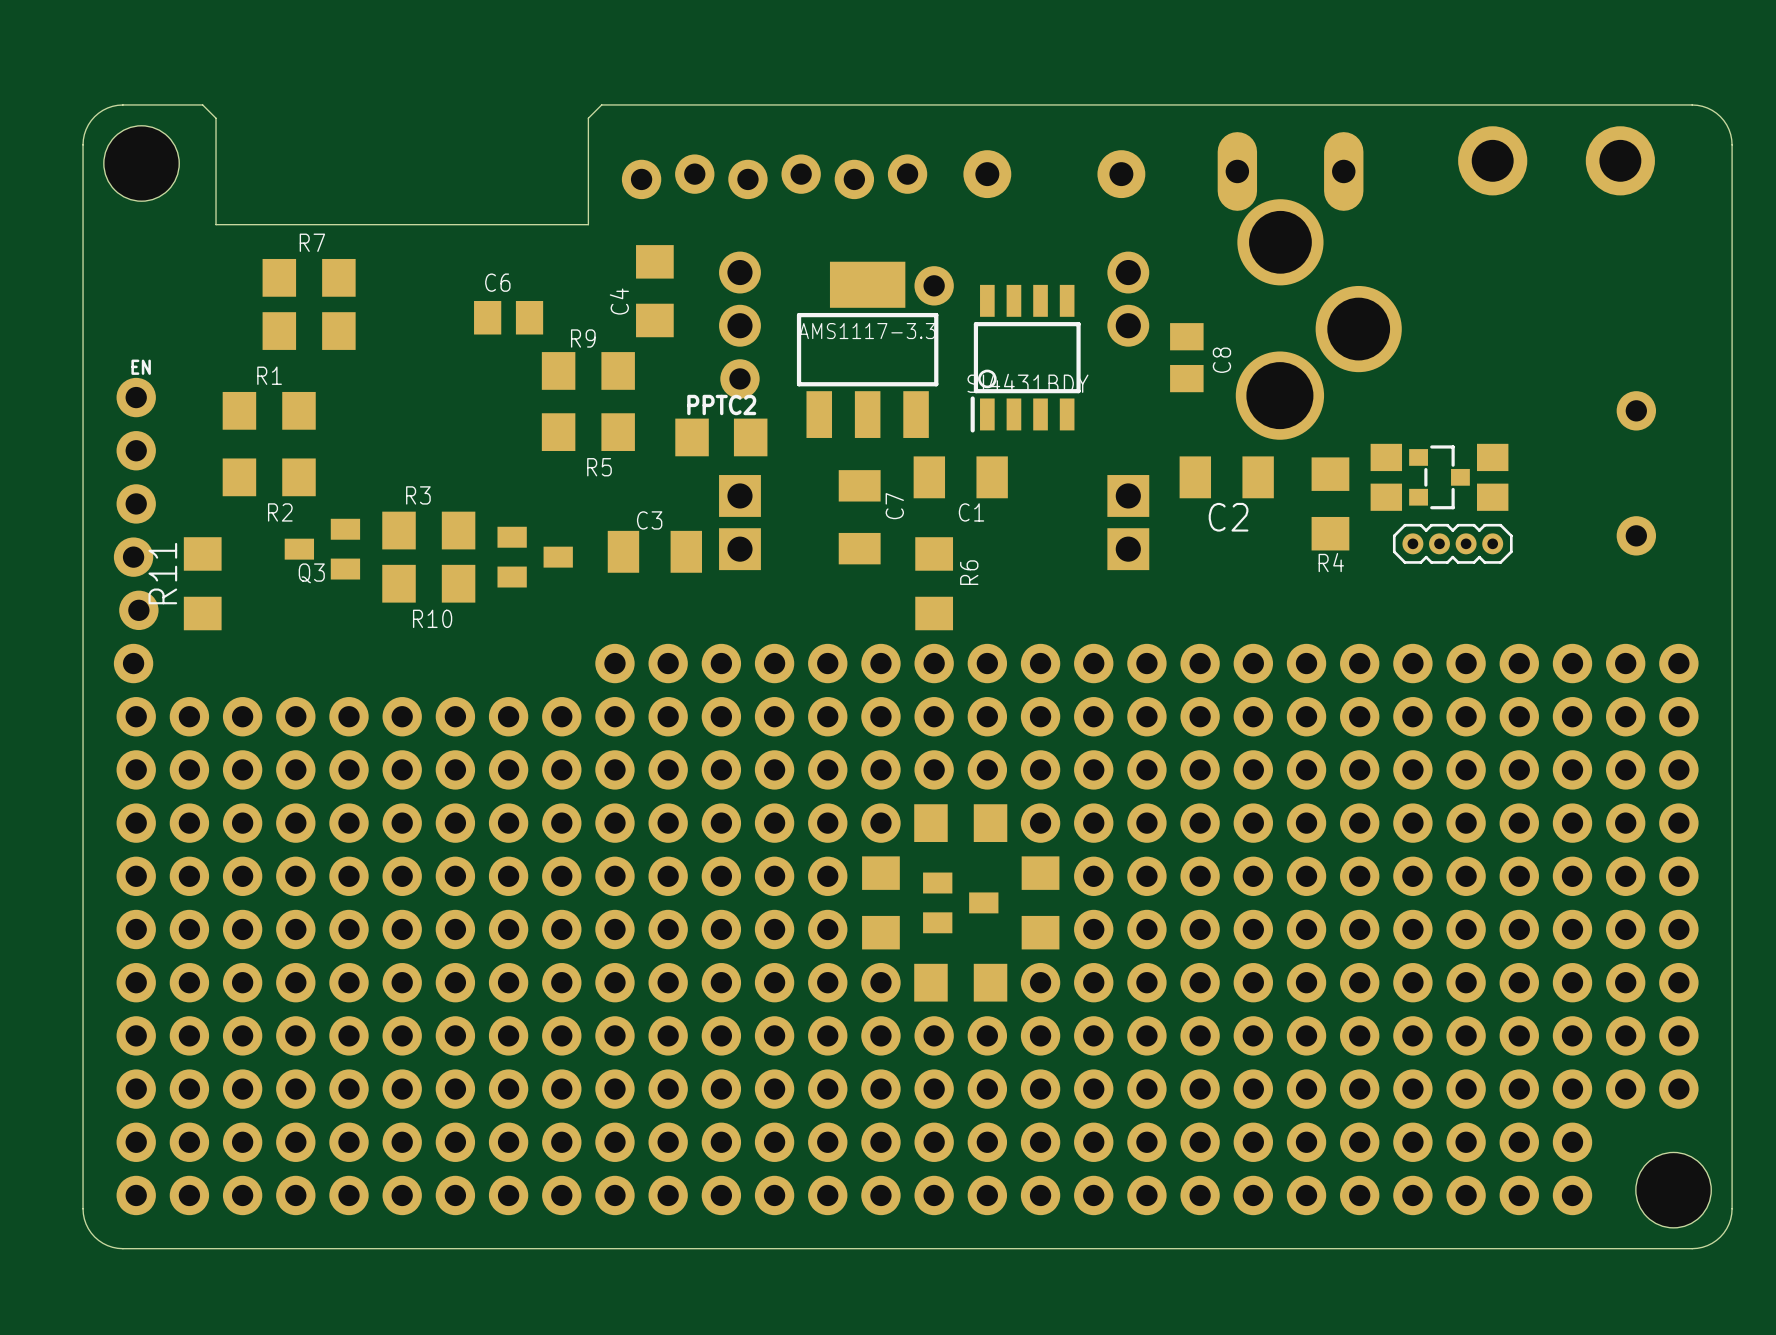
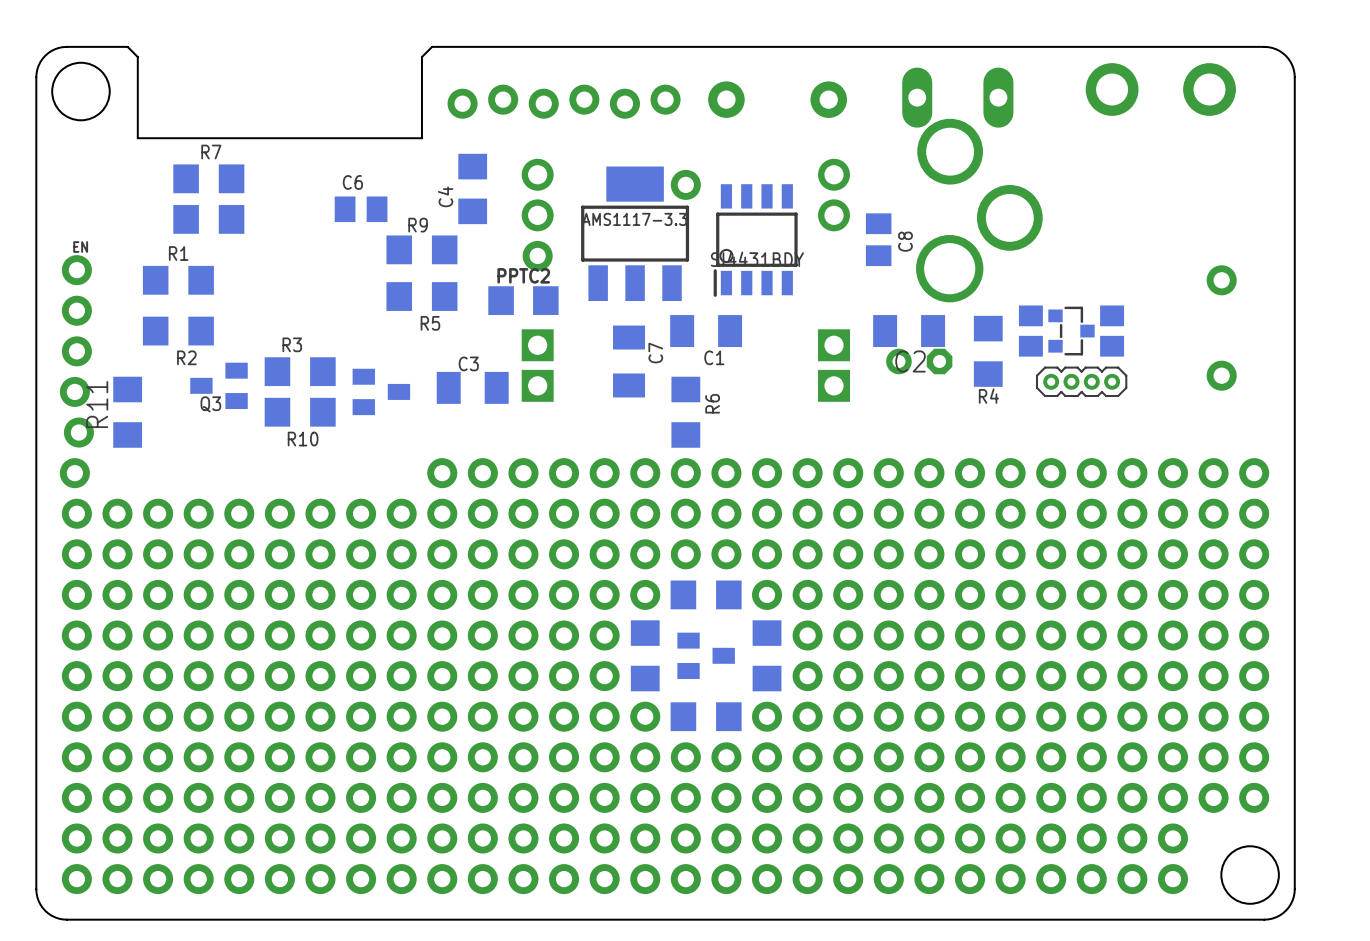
part: none -> (919, 361)

